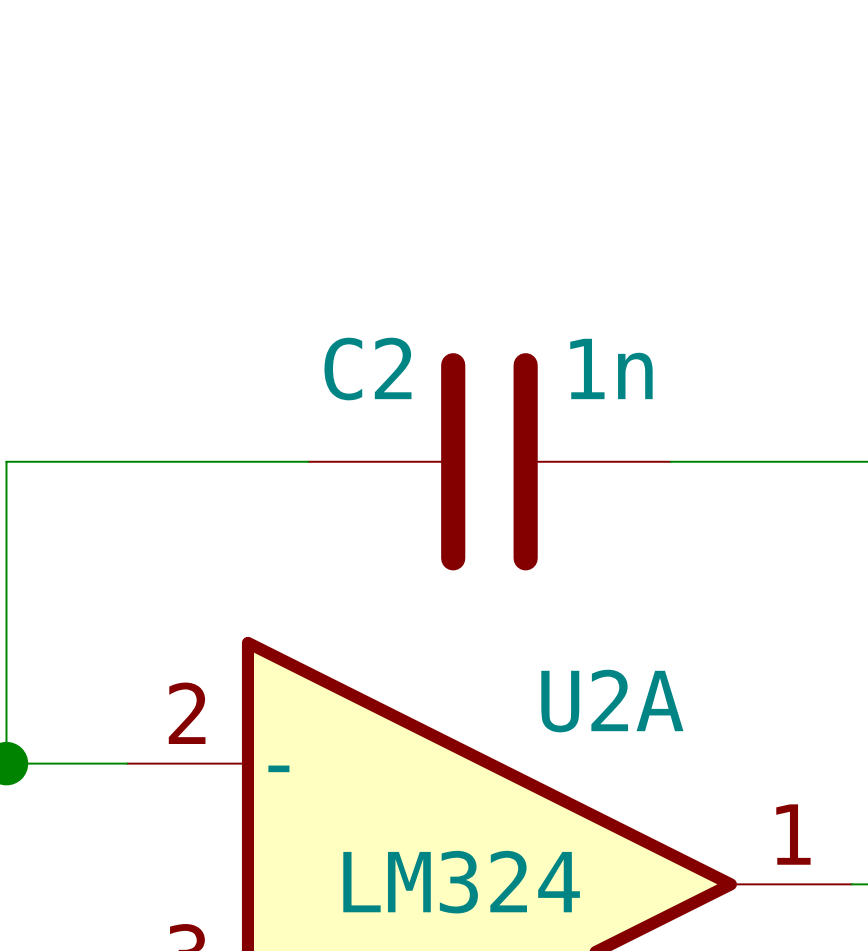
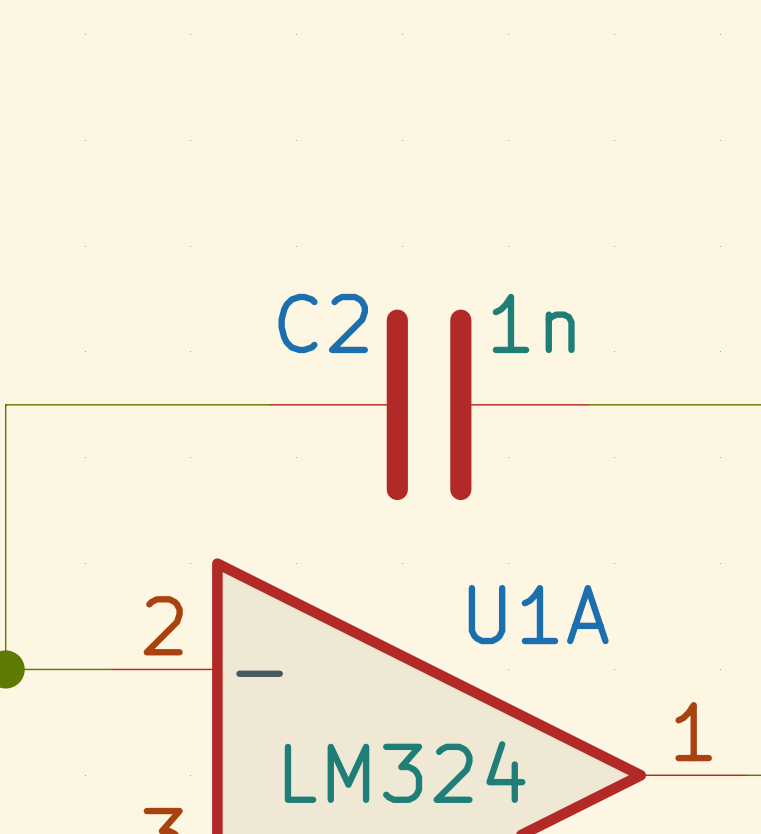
U2A name: U2A (612, 701) -> U1A (538, 614)

